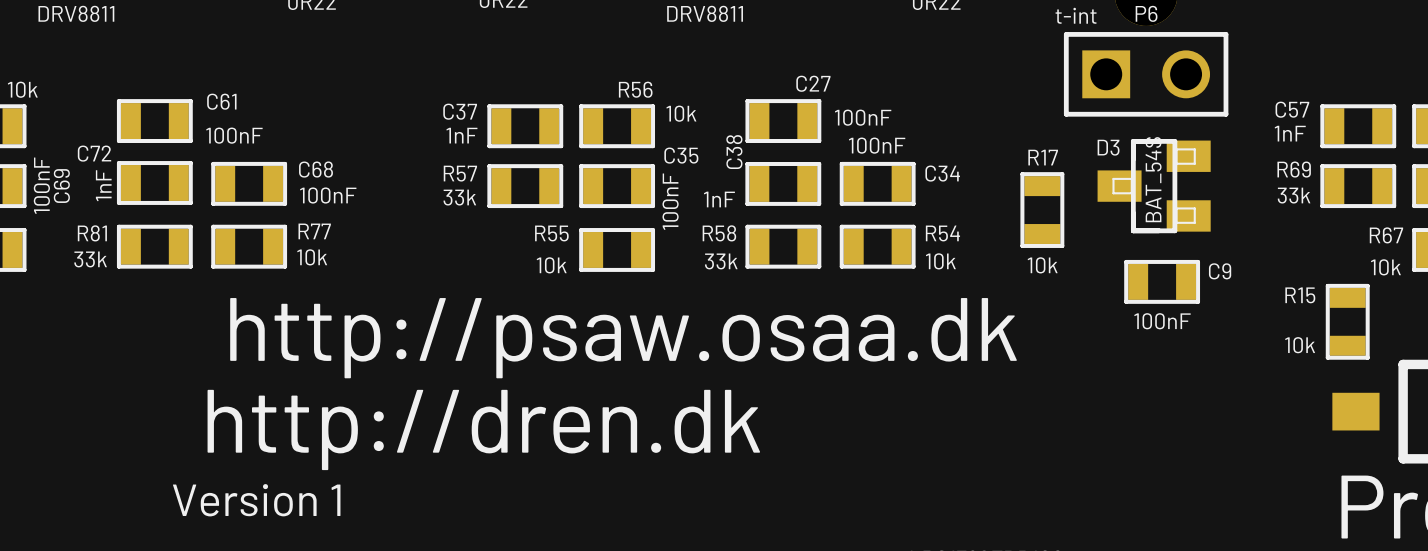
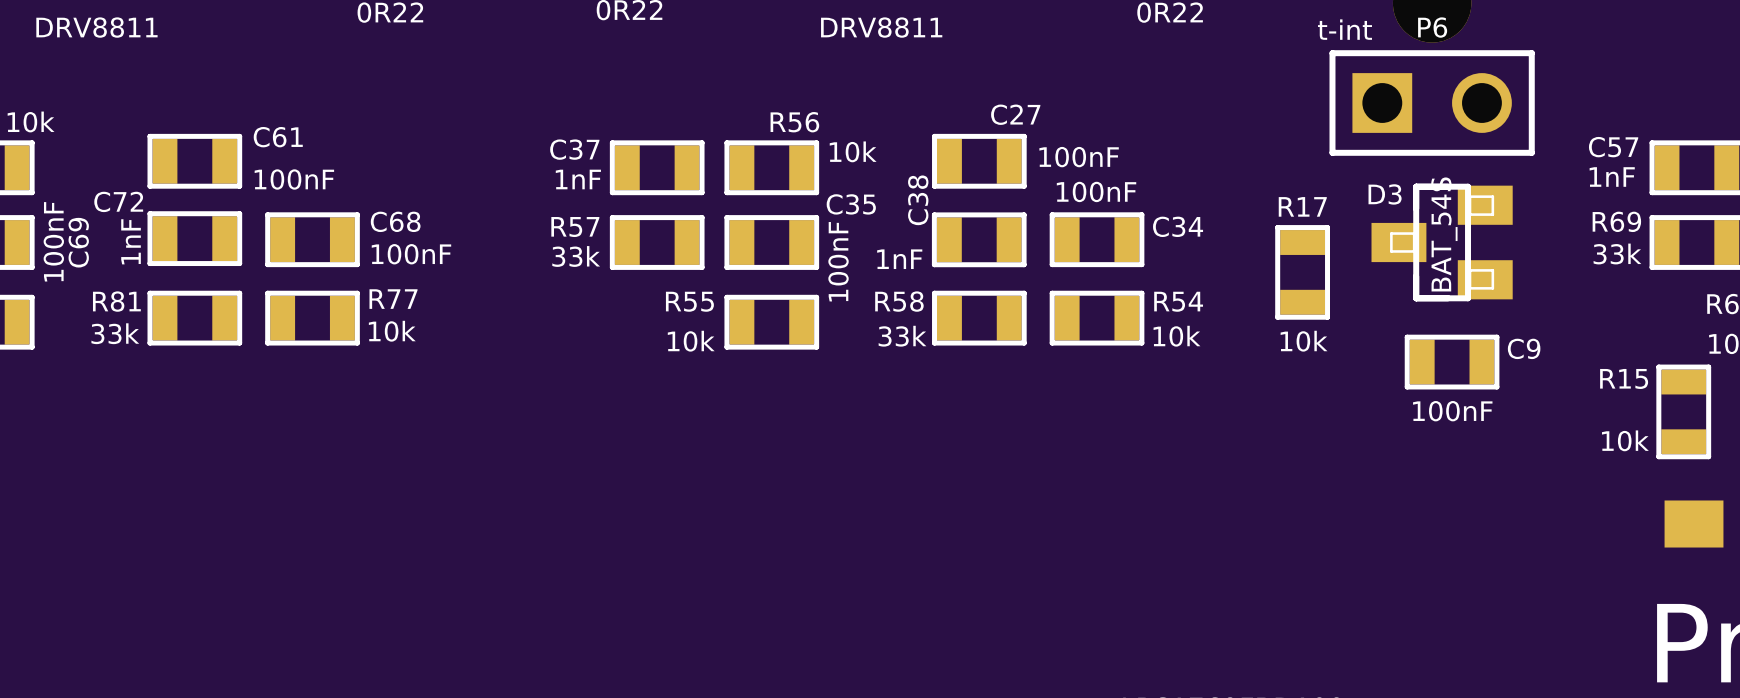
text: http://psaw.osaa.dk (623, 338) -> none
text: http://dren.dk (483, 429) -> none
text: Version 1 (256, 500) -> none

